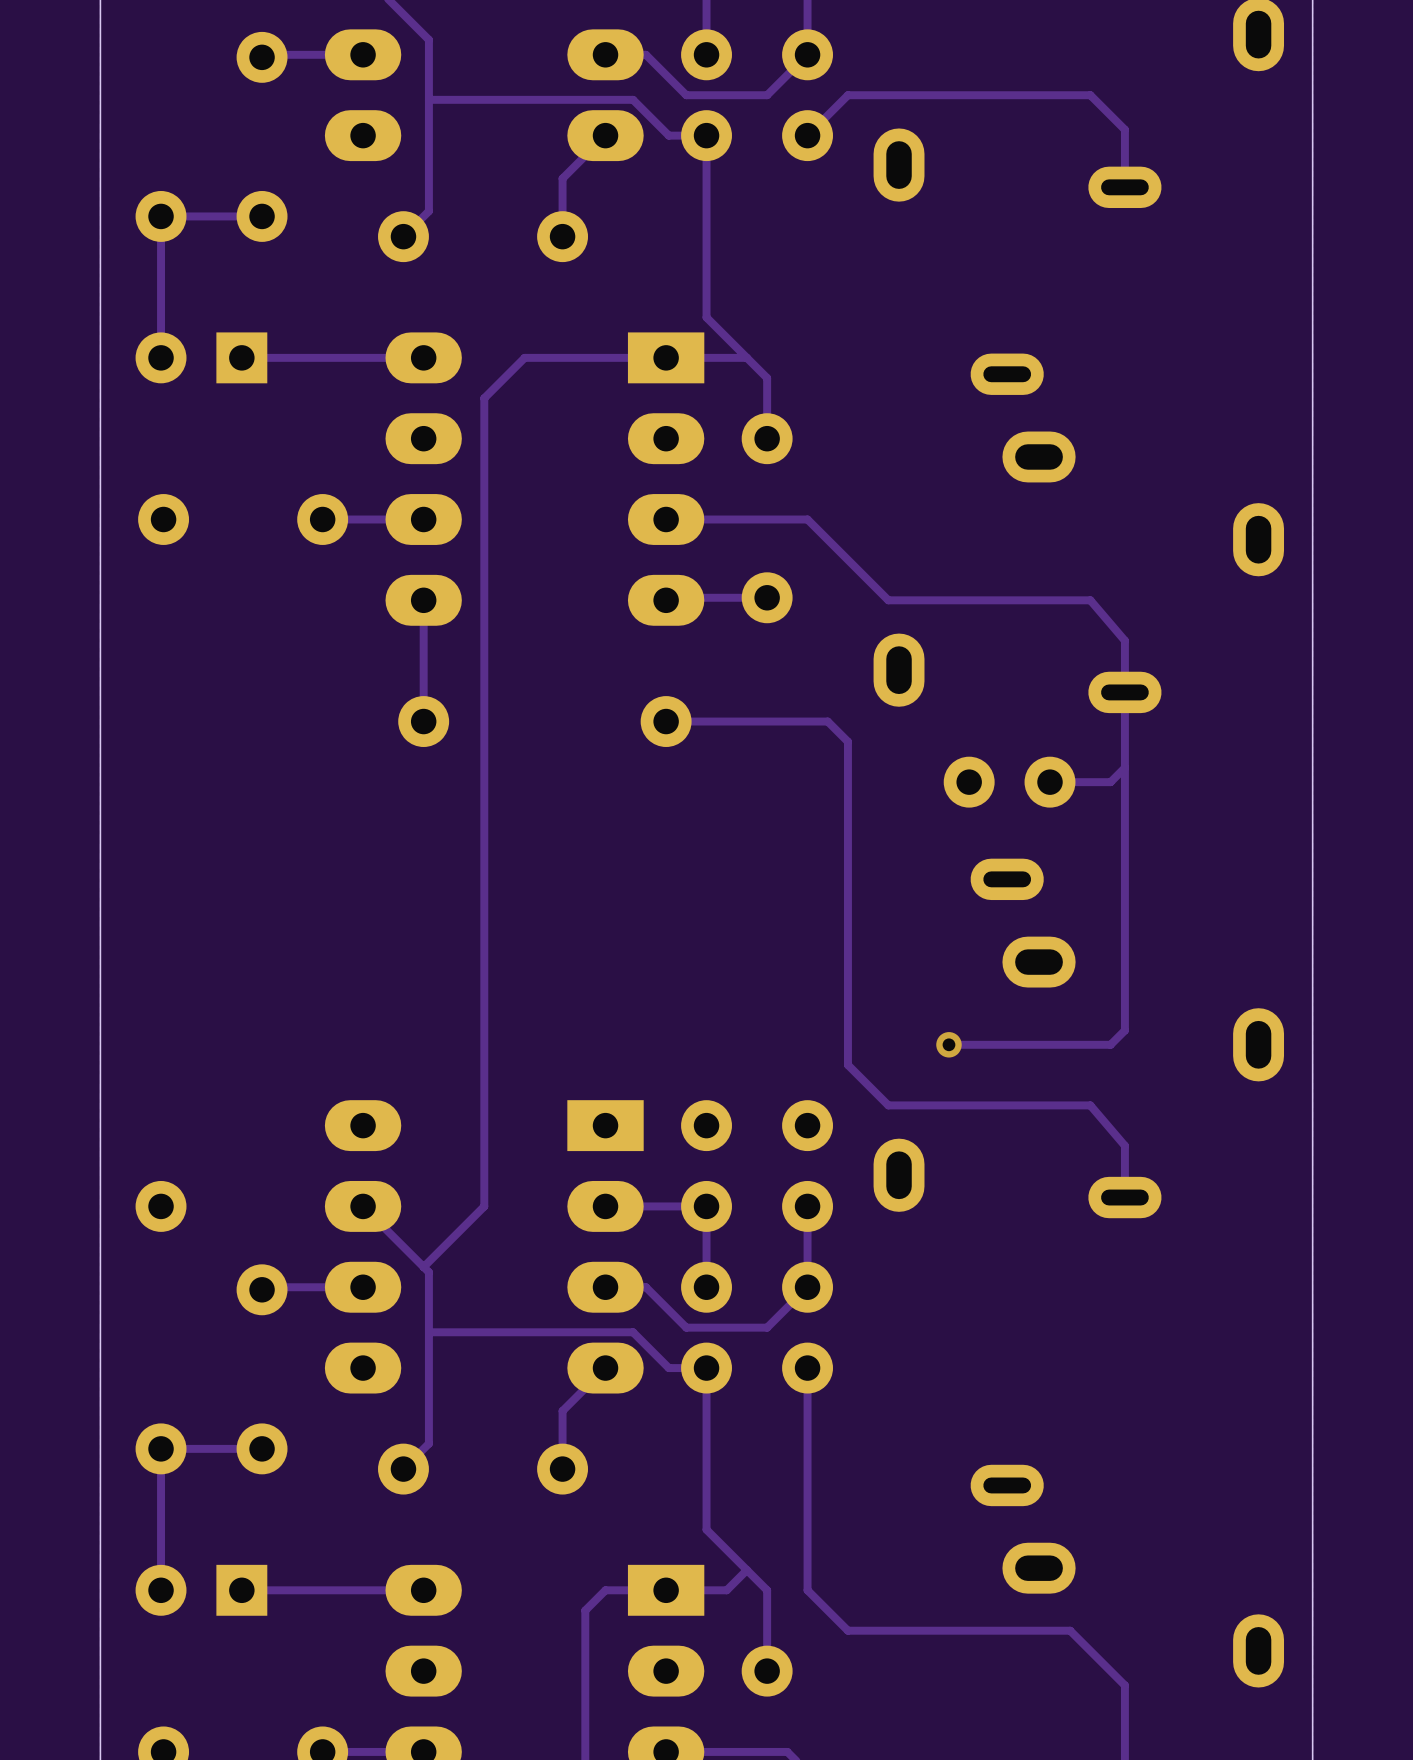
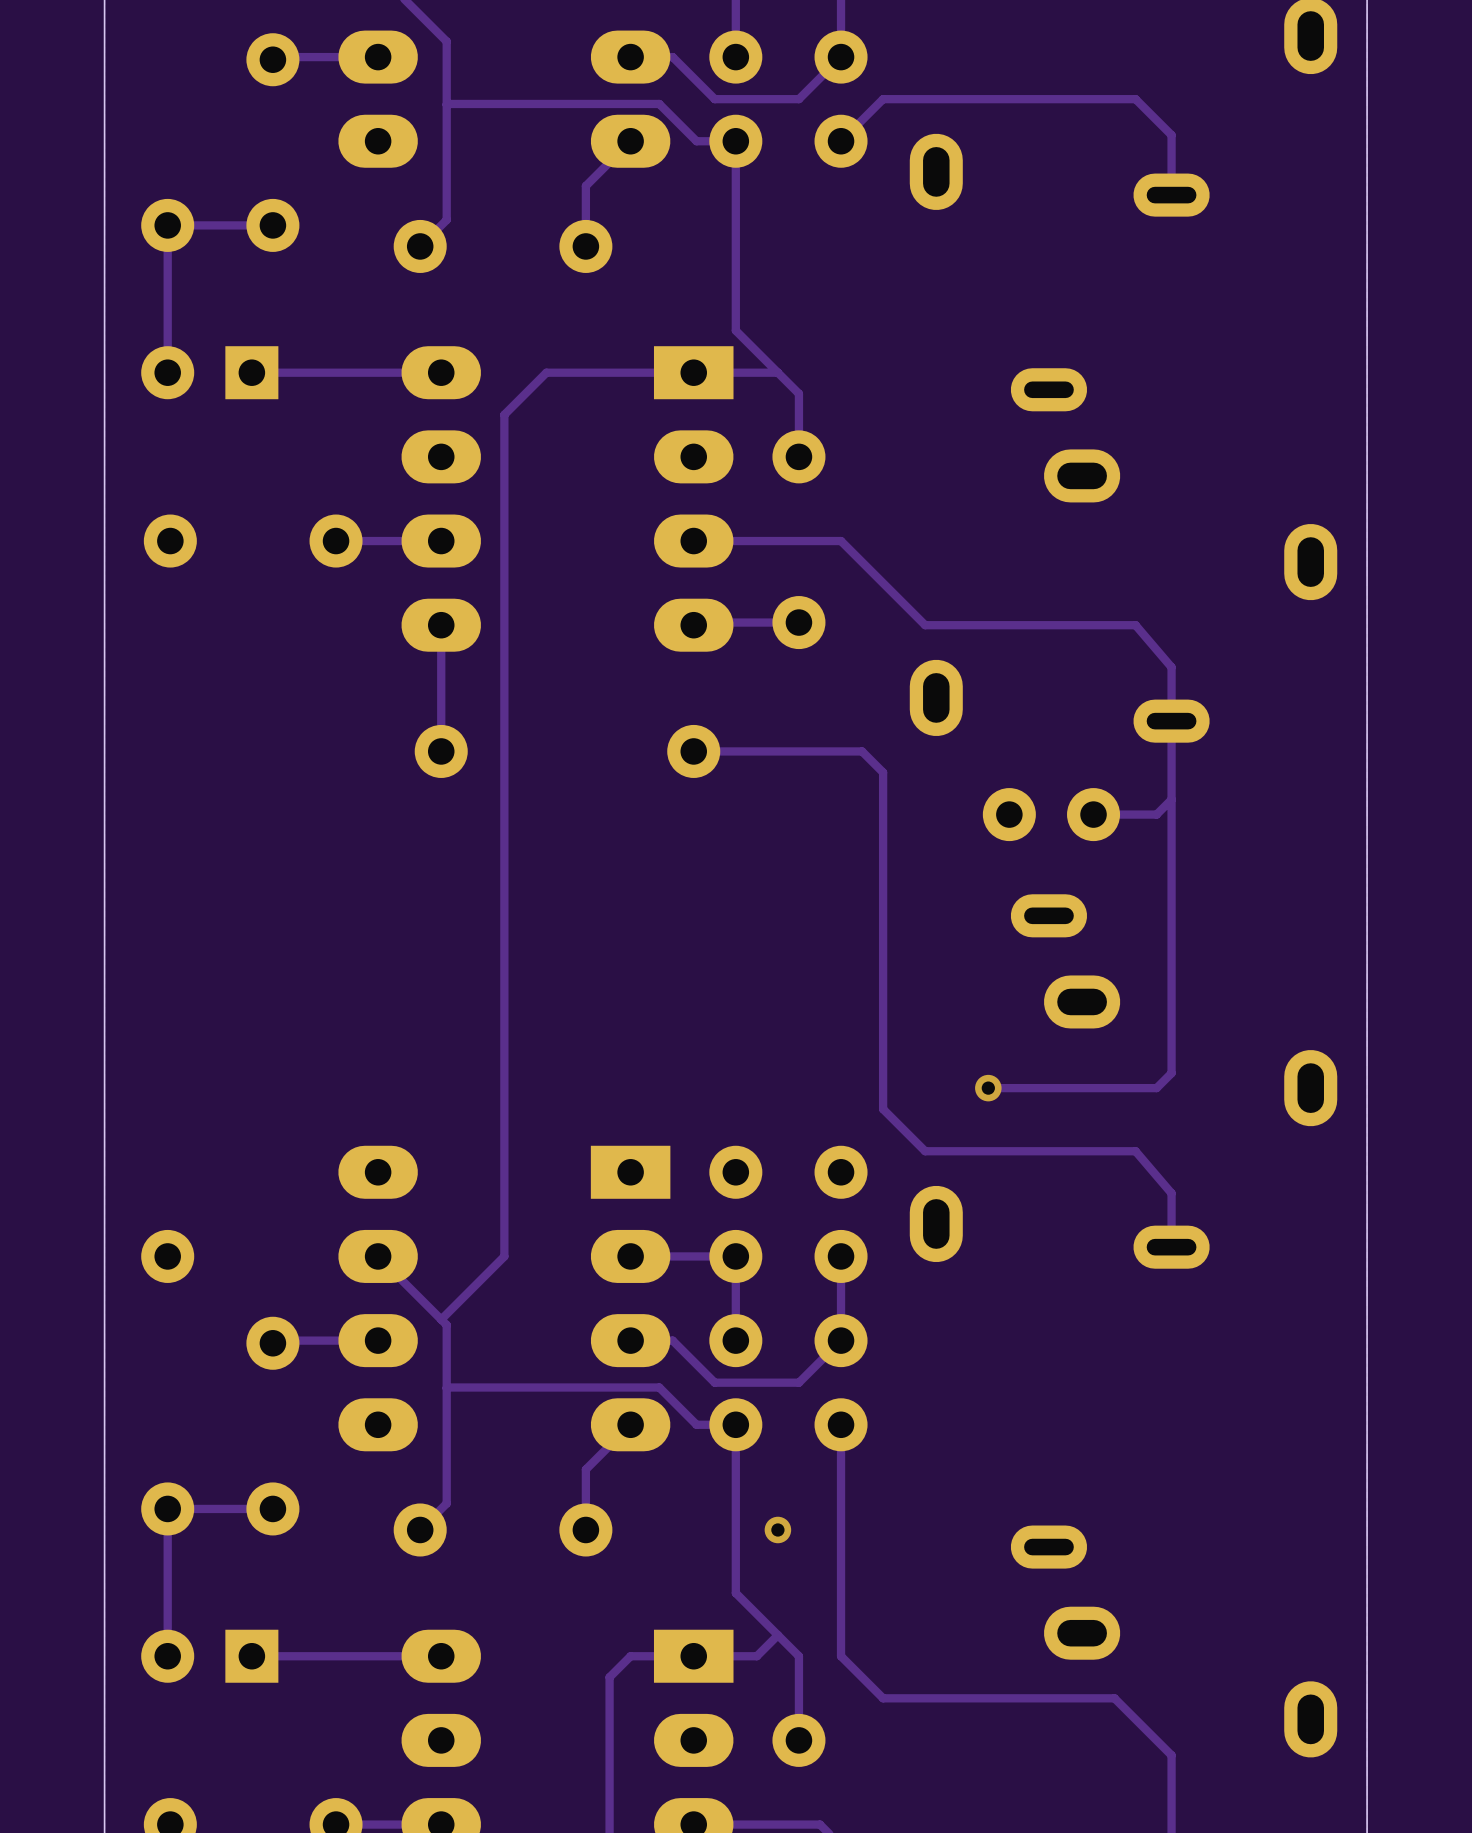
via: none -> (777, 1529)

